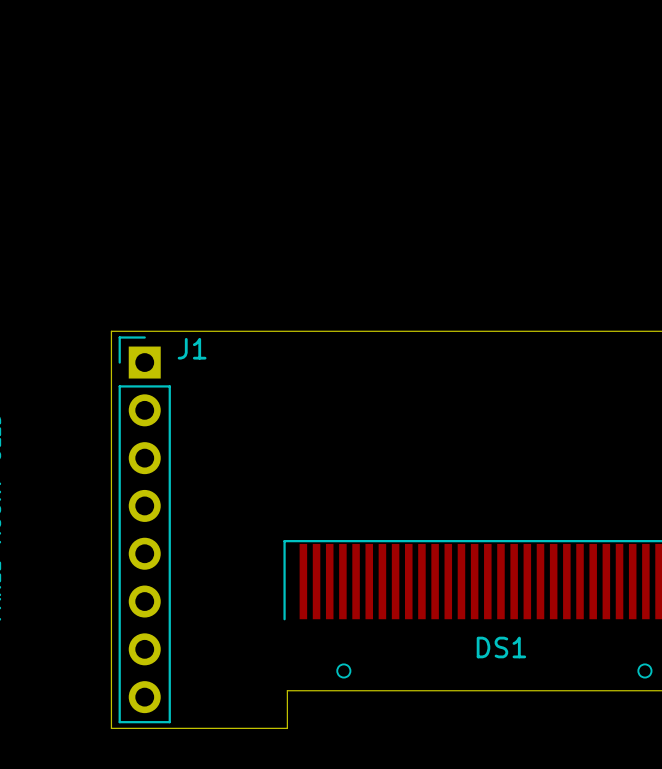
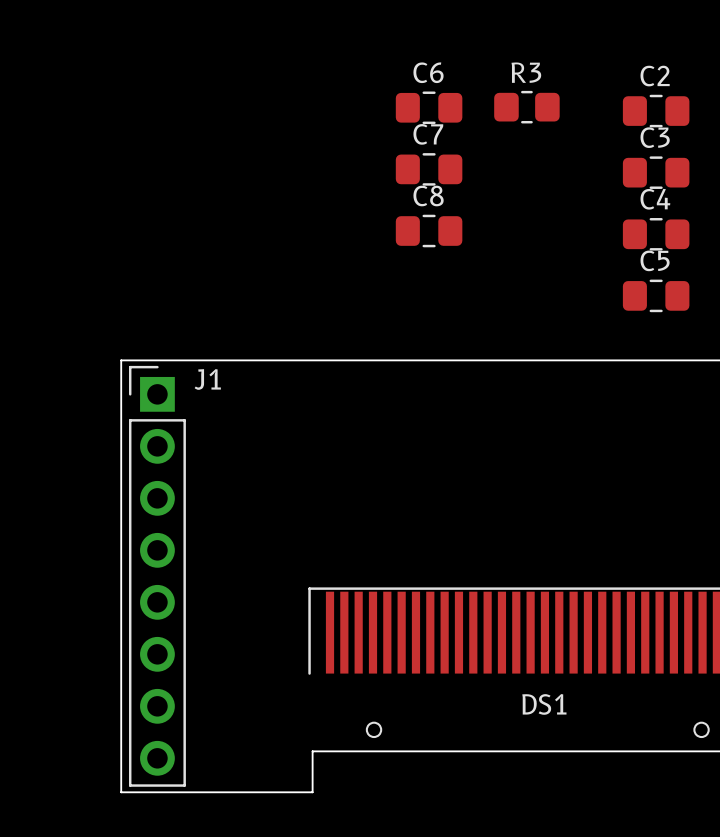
R3: none -> (526, 107)
C6: none -> (429, 107)
C2: none -> (656, 111)
C7: none -> (429, 169)
C3: none -> (656, 172)
C8: none -> (429, 231)
C4: none -> (656, 234)
C5: none -> (656, 295)

